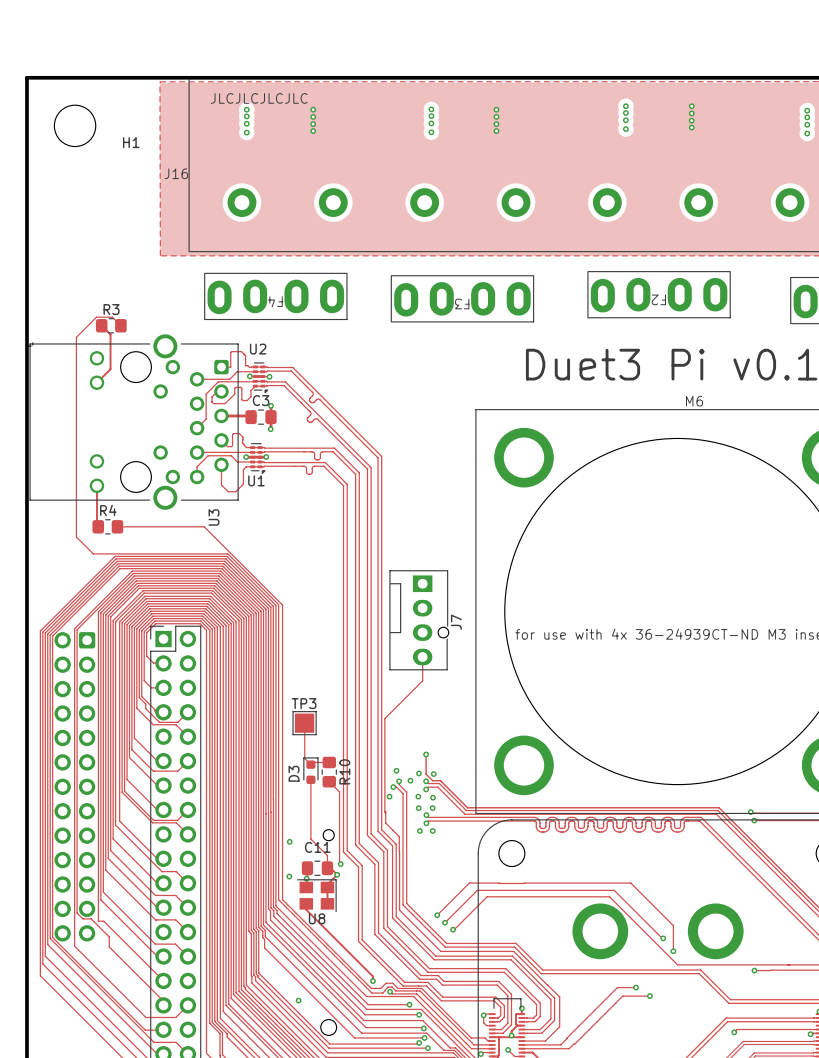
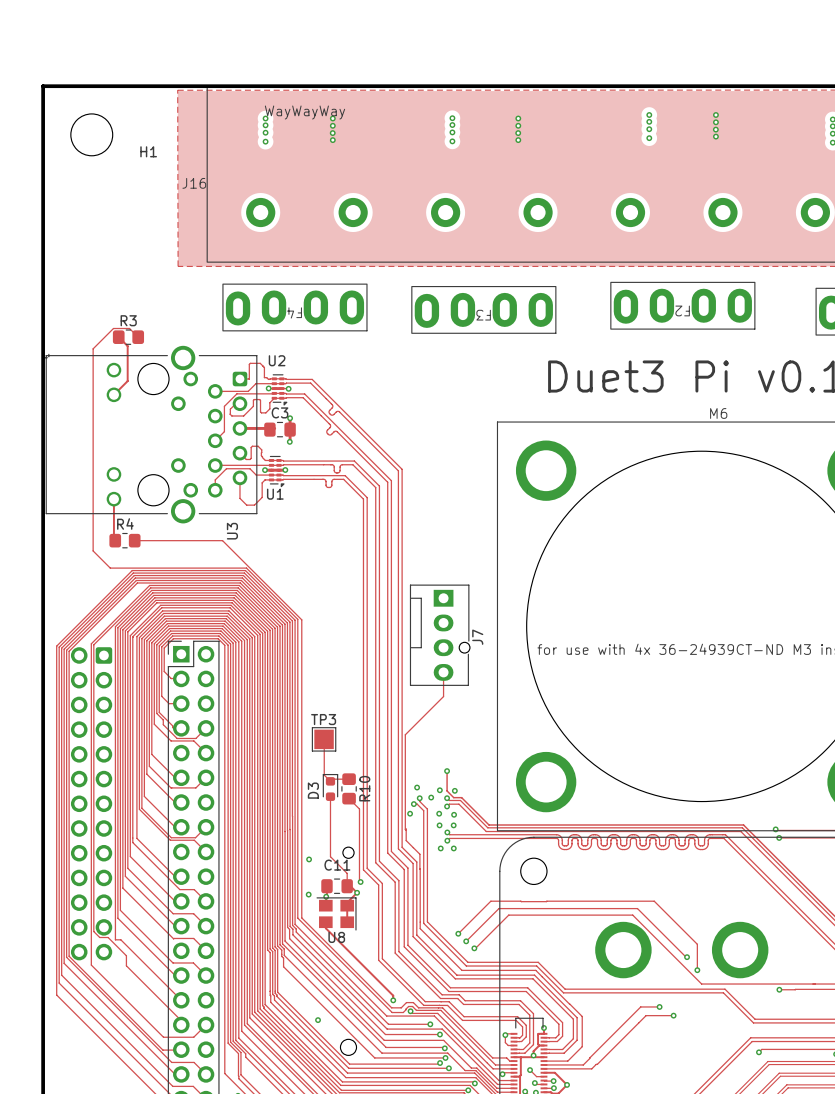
text: JLCJLCJLCJLC (259, 98) -> none
text: none -> WayWayWay (304, 112)

